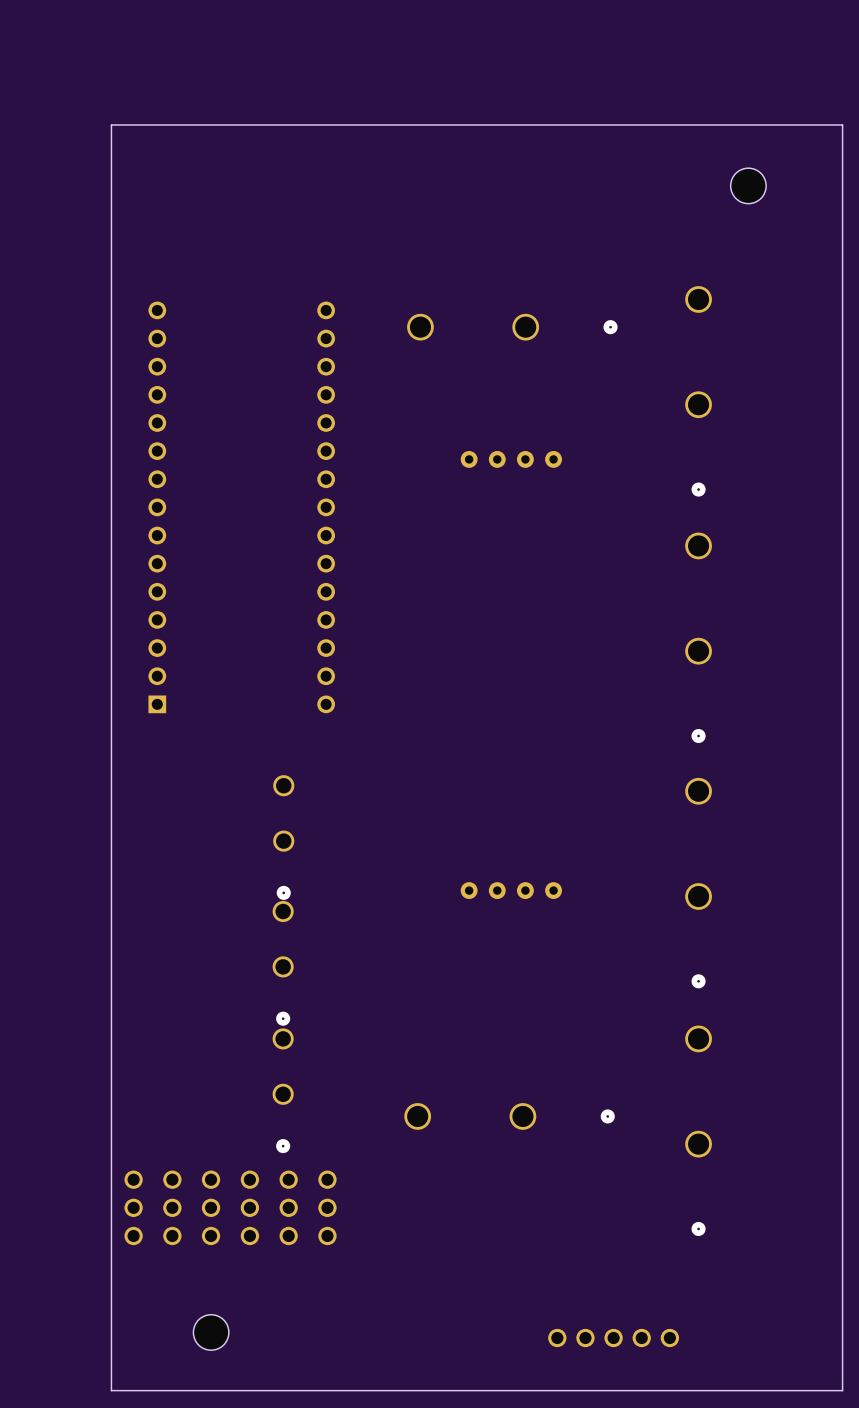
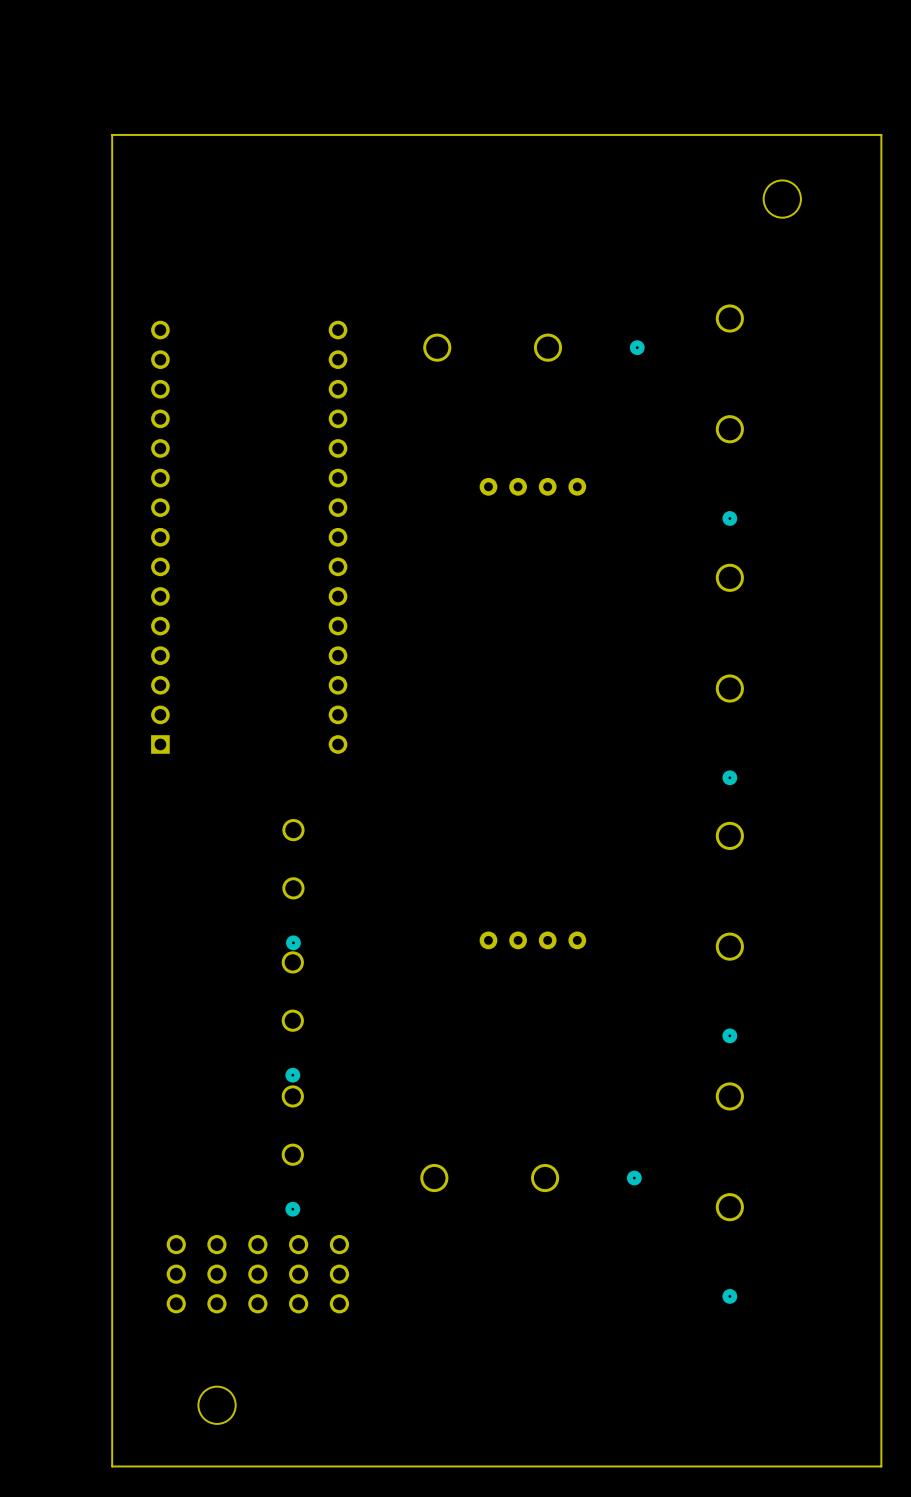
part: (133, 1207) -> none
part: (613, 1338) -> none

